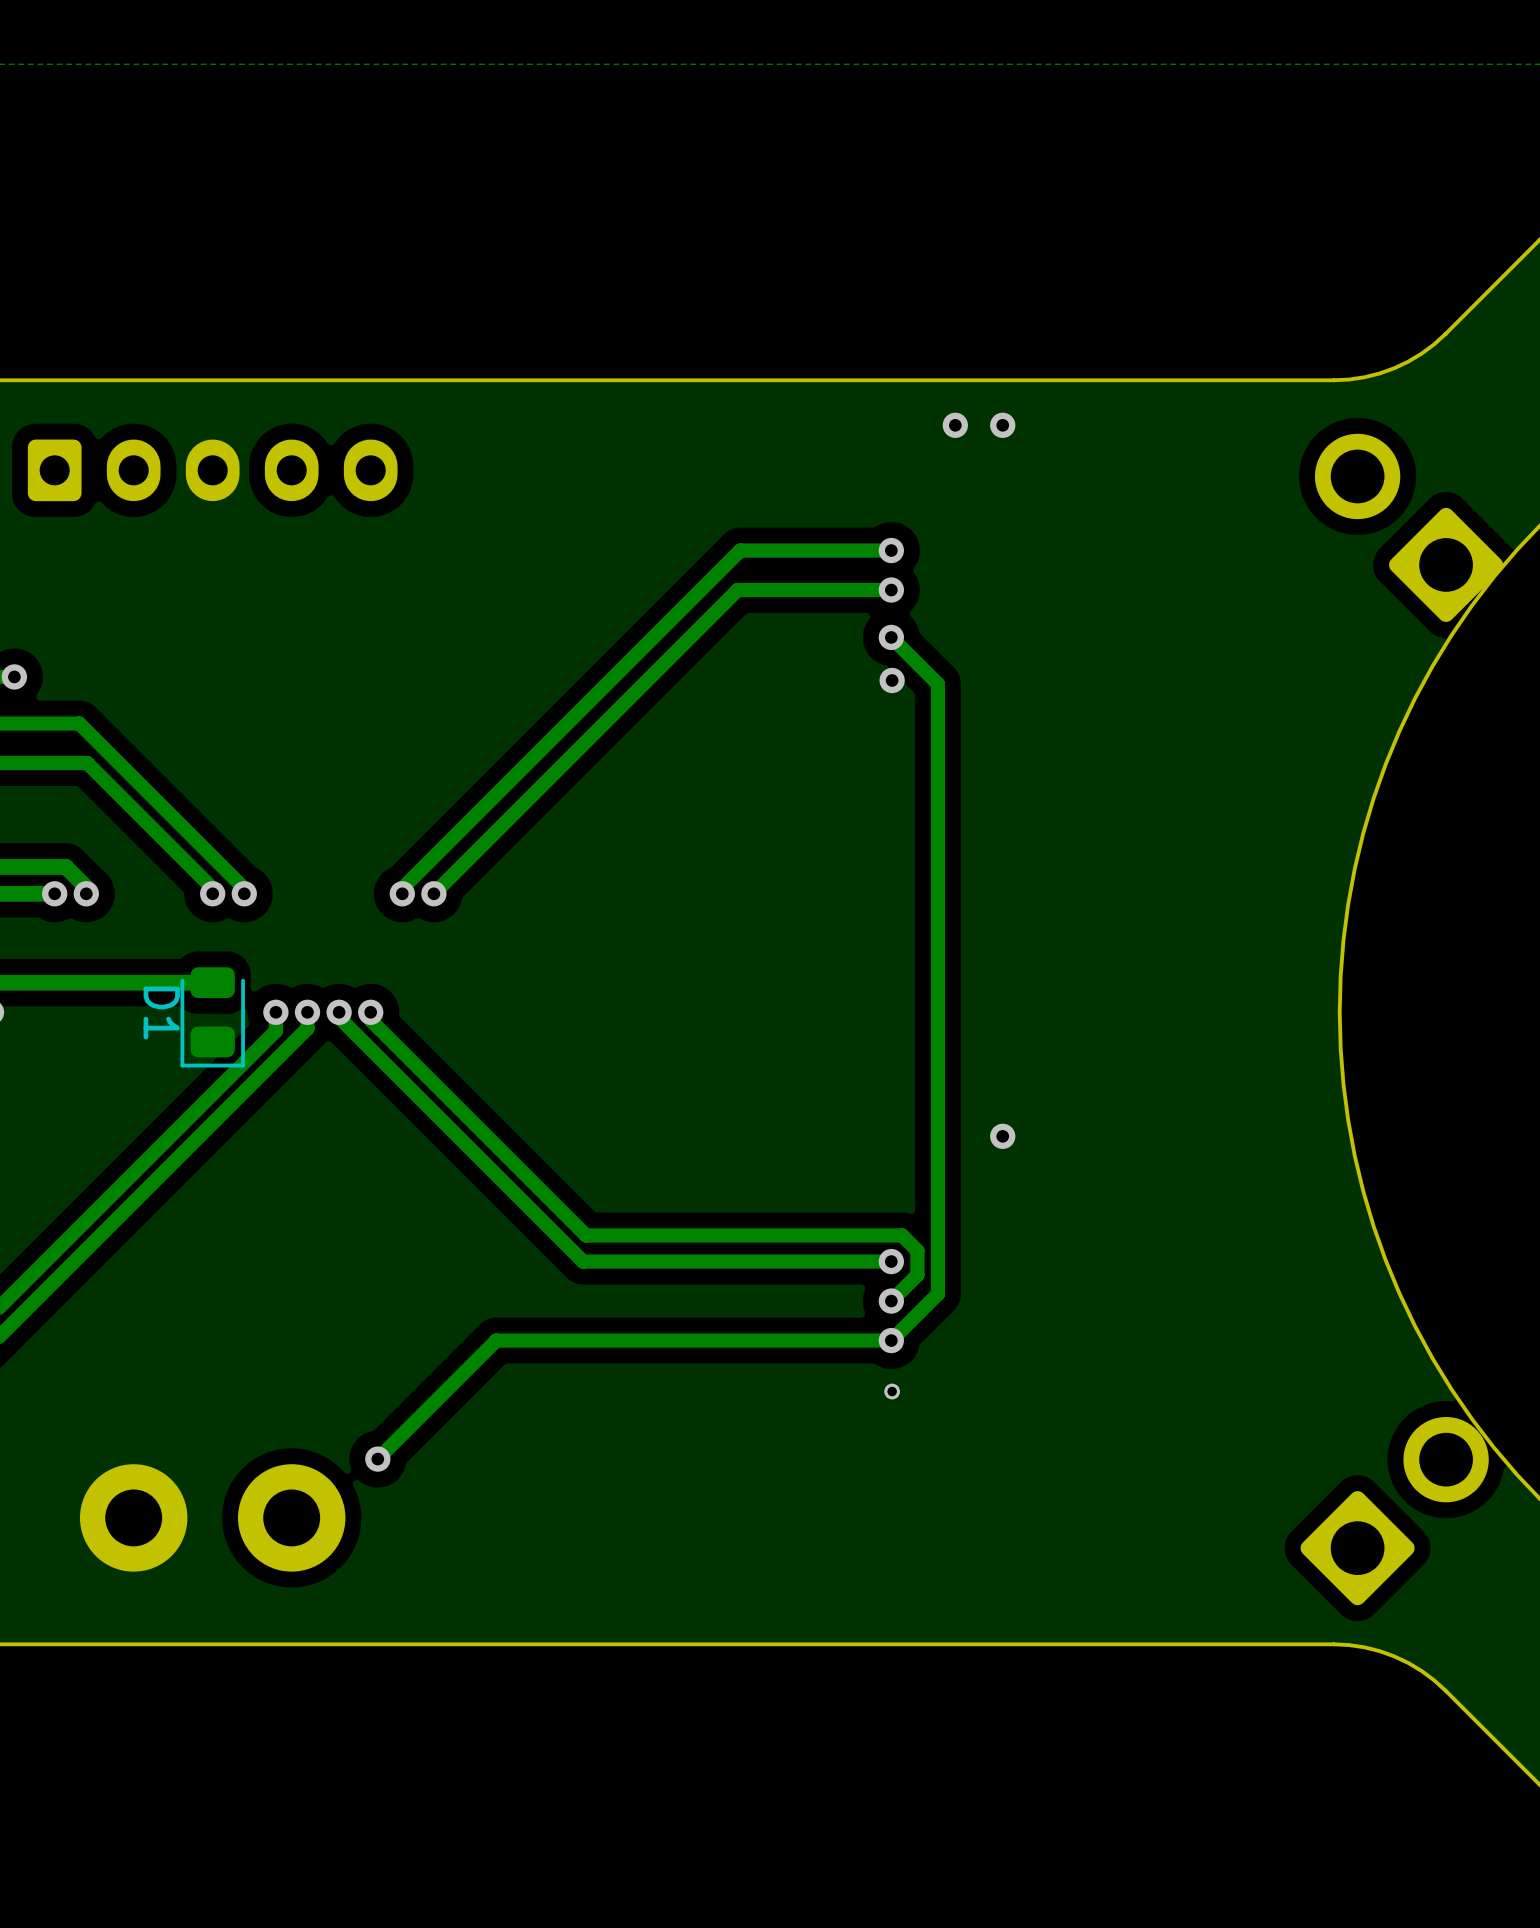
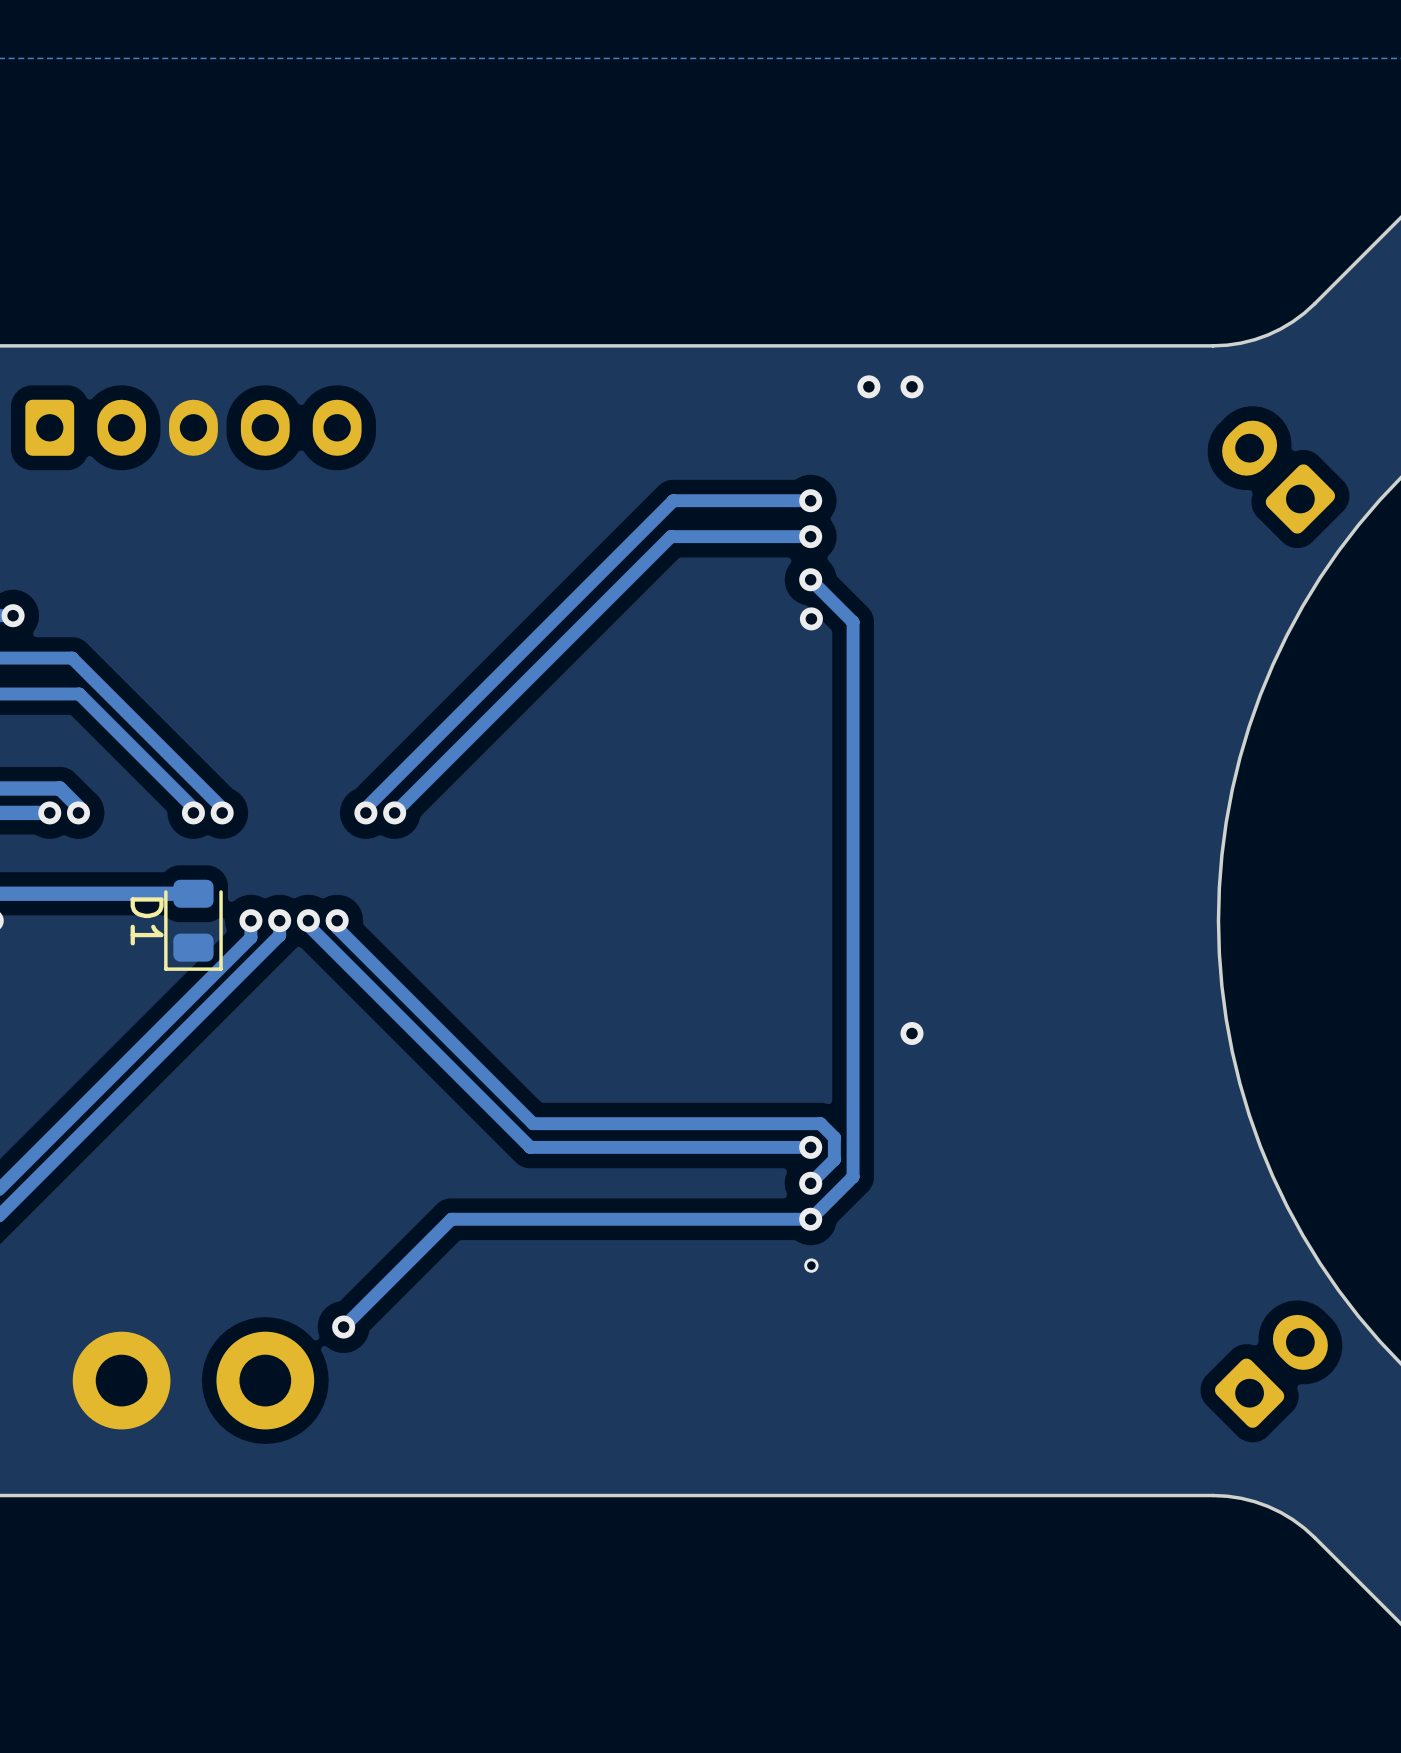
part footprint: [1314, 433, 1504, 623] -> [1222, 420, 1336, 534]
part footprint: [1300, 1417, 1489, 1606] -> [1214, 1314, 1328, 1428]

